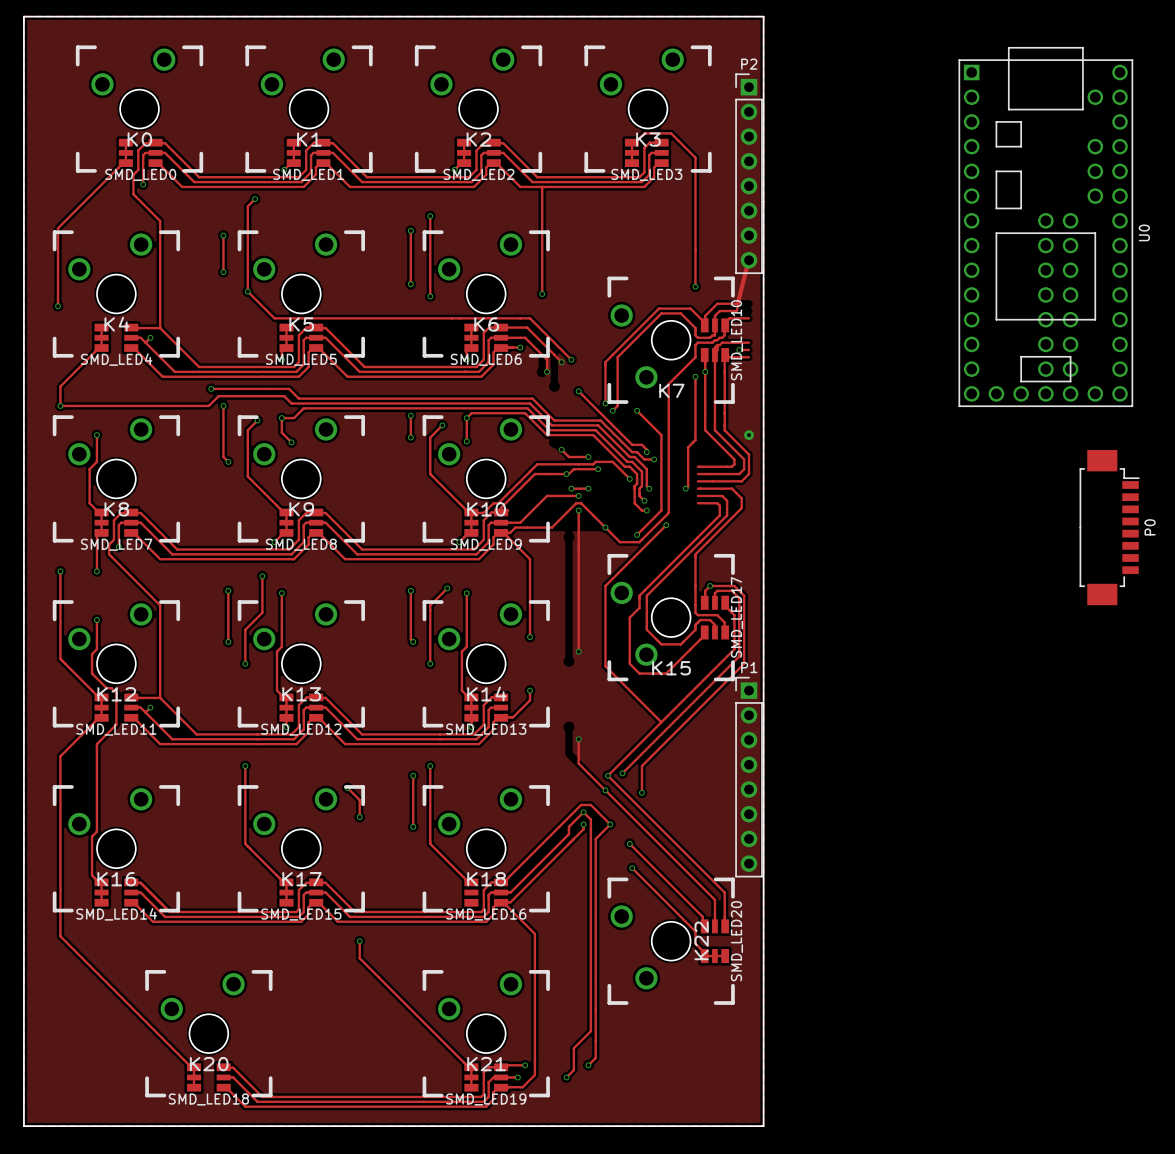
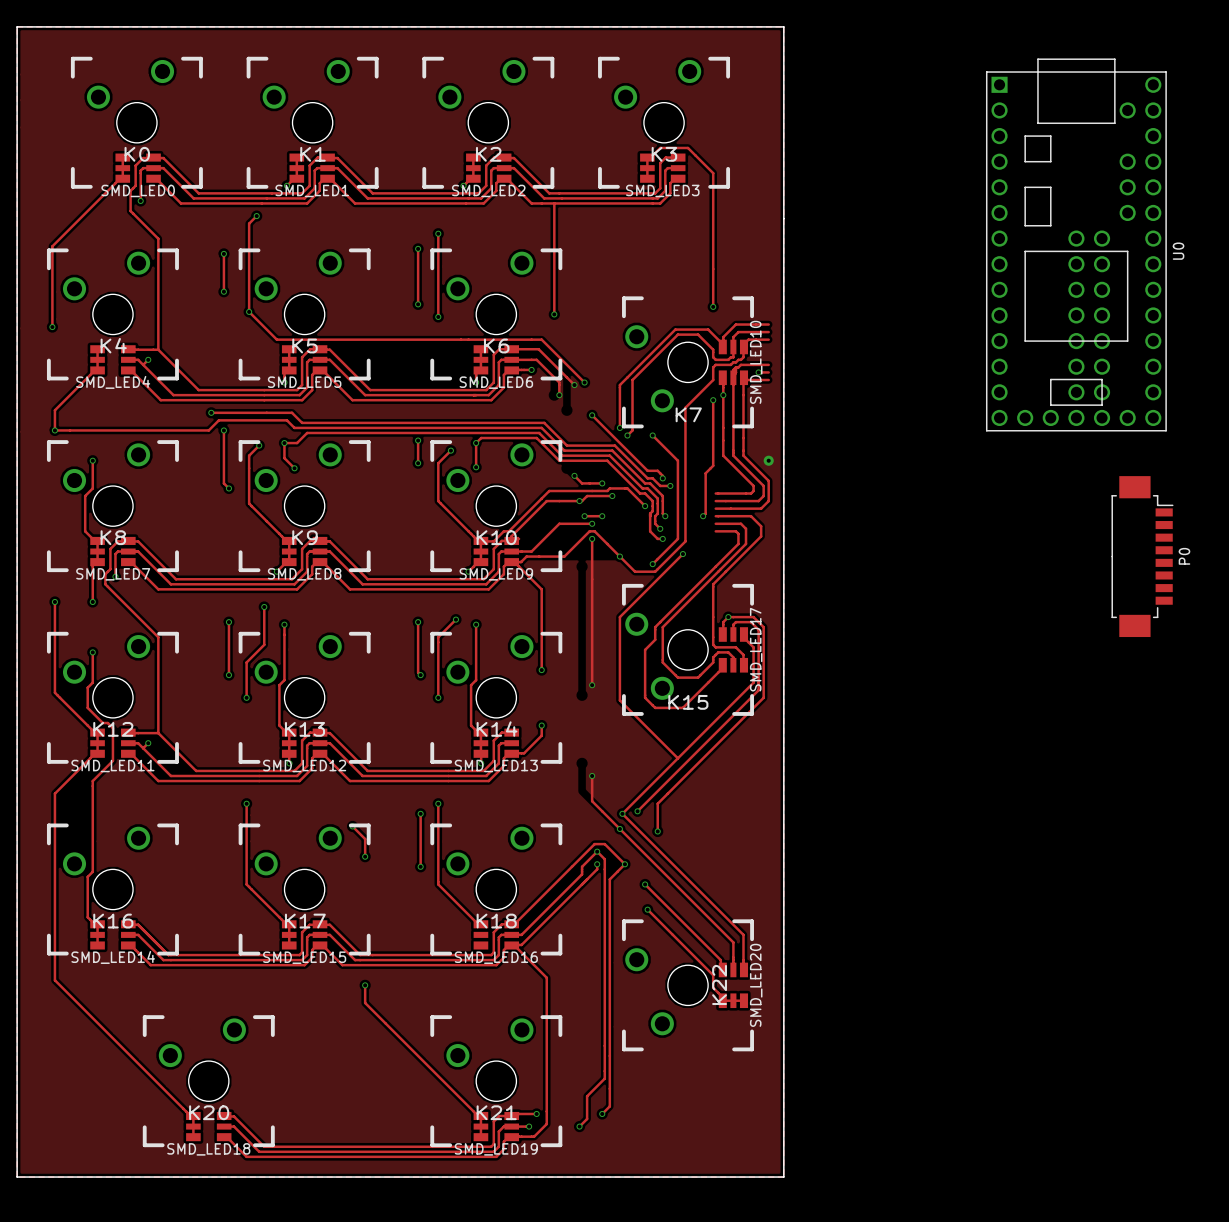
P2: (749, 173) -> none
track: (749, 255) (736, 303) -> (768, 324) (756, 324)
track: (749, 262) (736, 311) -> (768, 332) (756, 332)
P1: (749, 777) -> none

